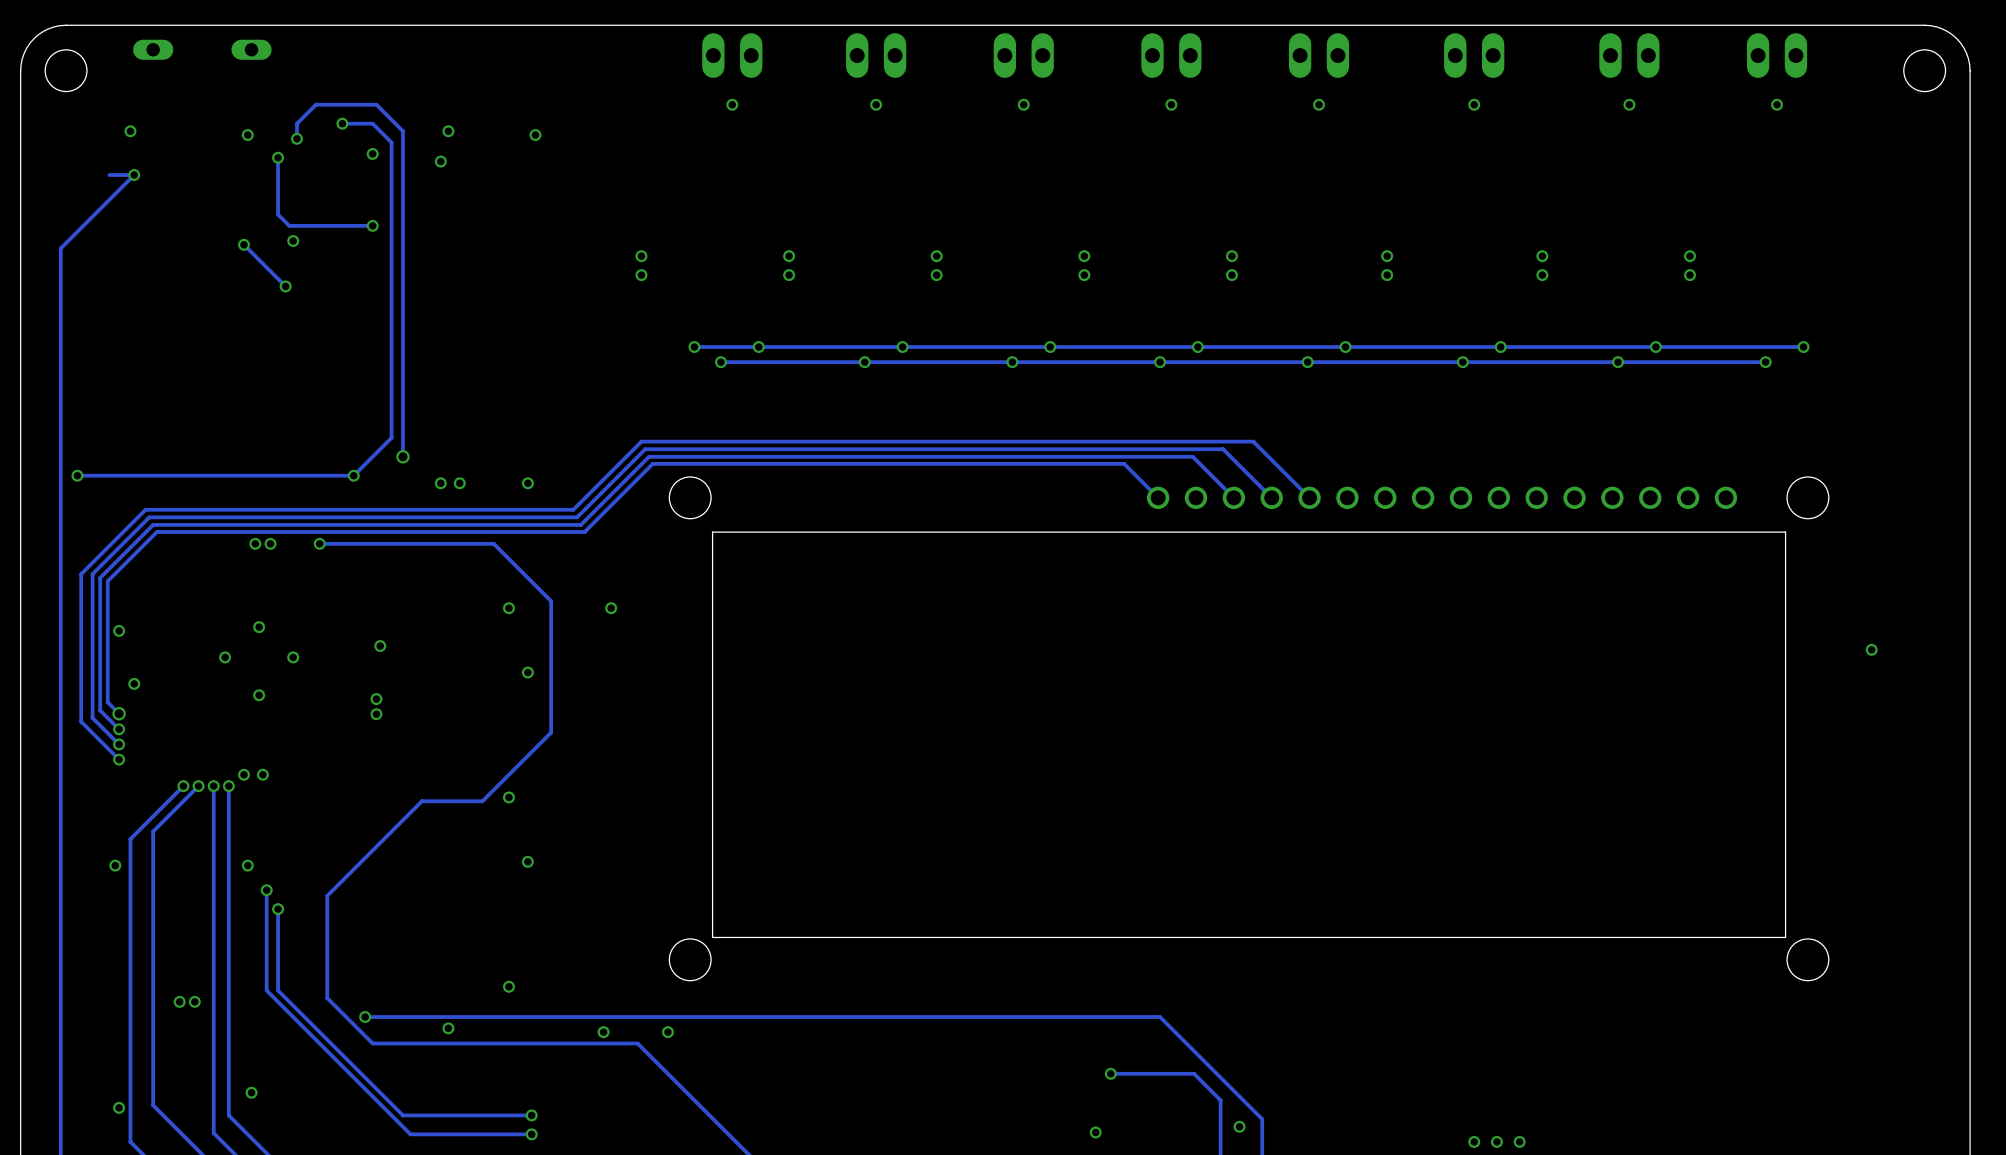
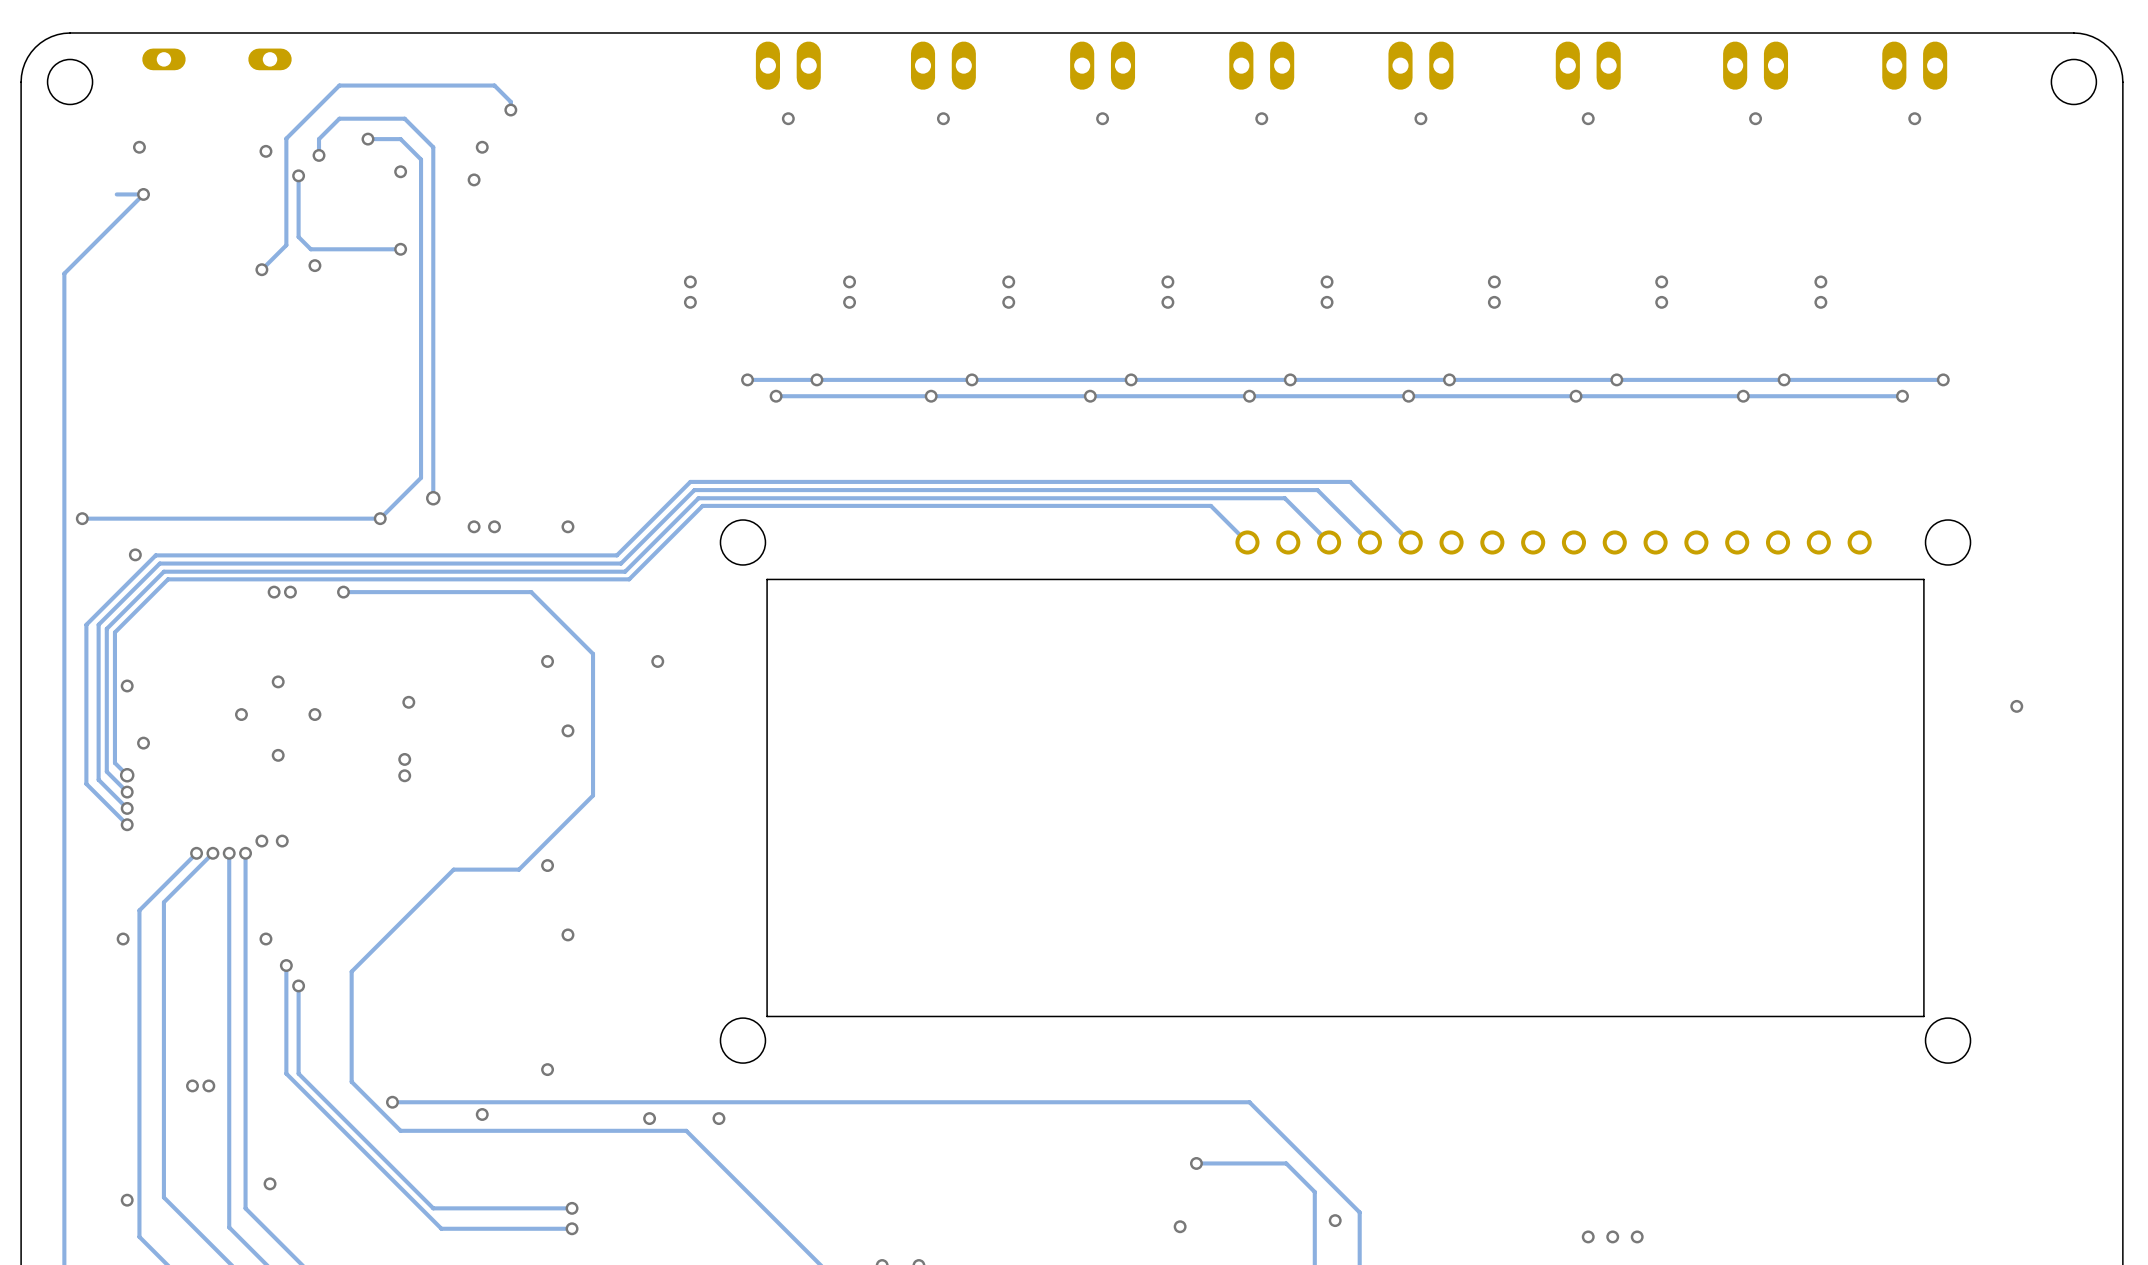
via position: (535, 135) -> (510, 110)
track: (243, 244) (285, 286) -> (261, 269) (286, 245) (286, 138) (339, 85) (494, 85) (510, 101) (510, 110)
via: (285, 286) -> none
via: none -> (135, 554)

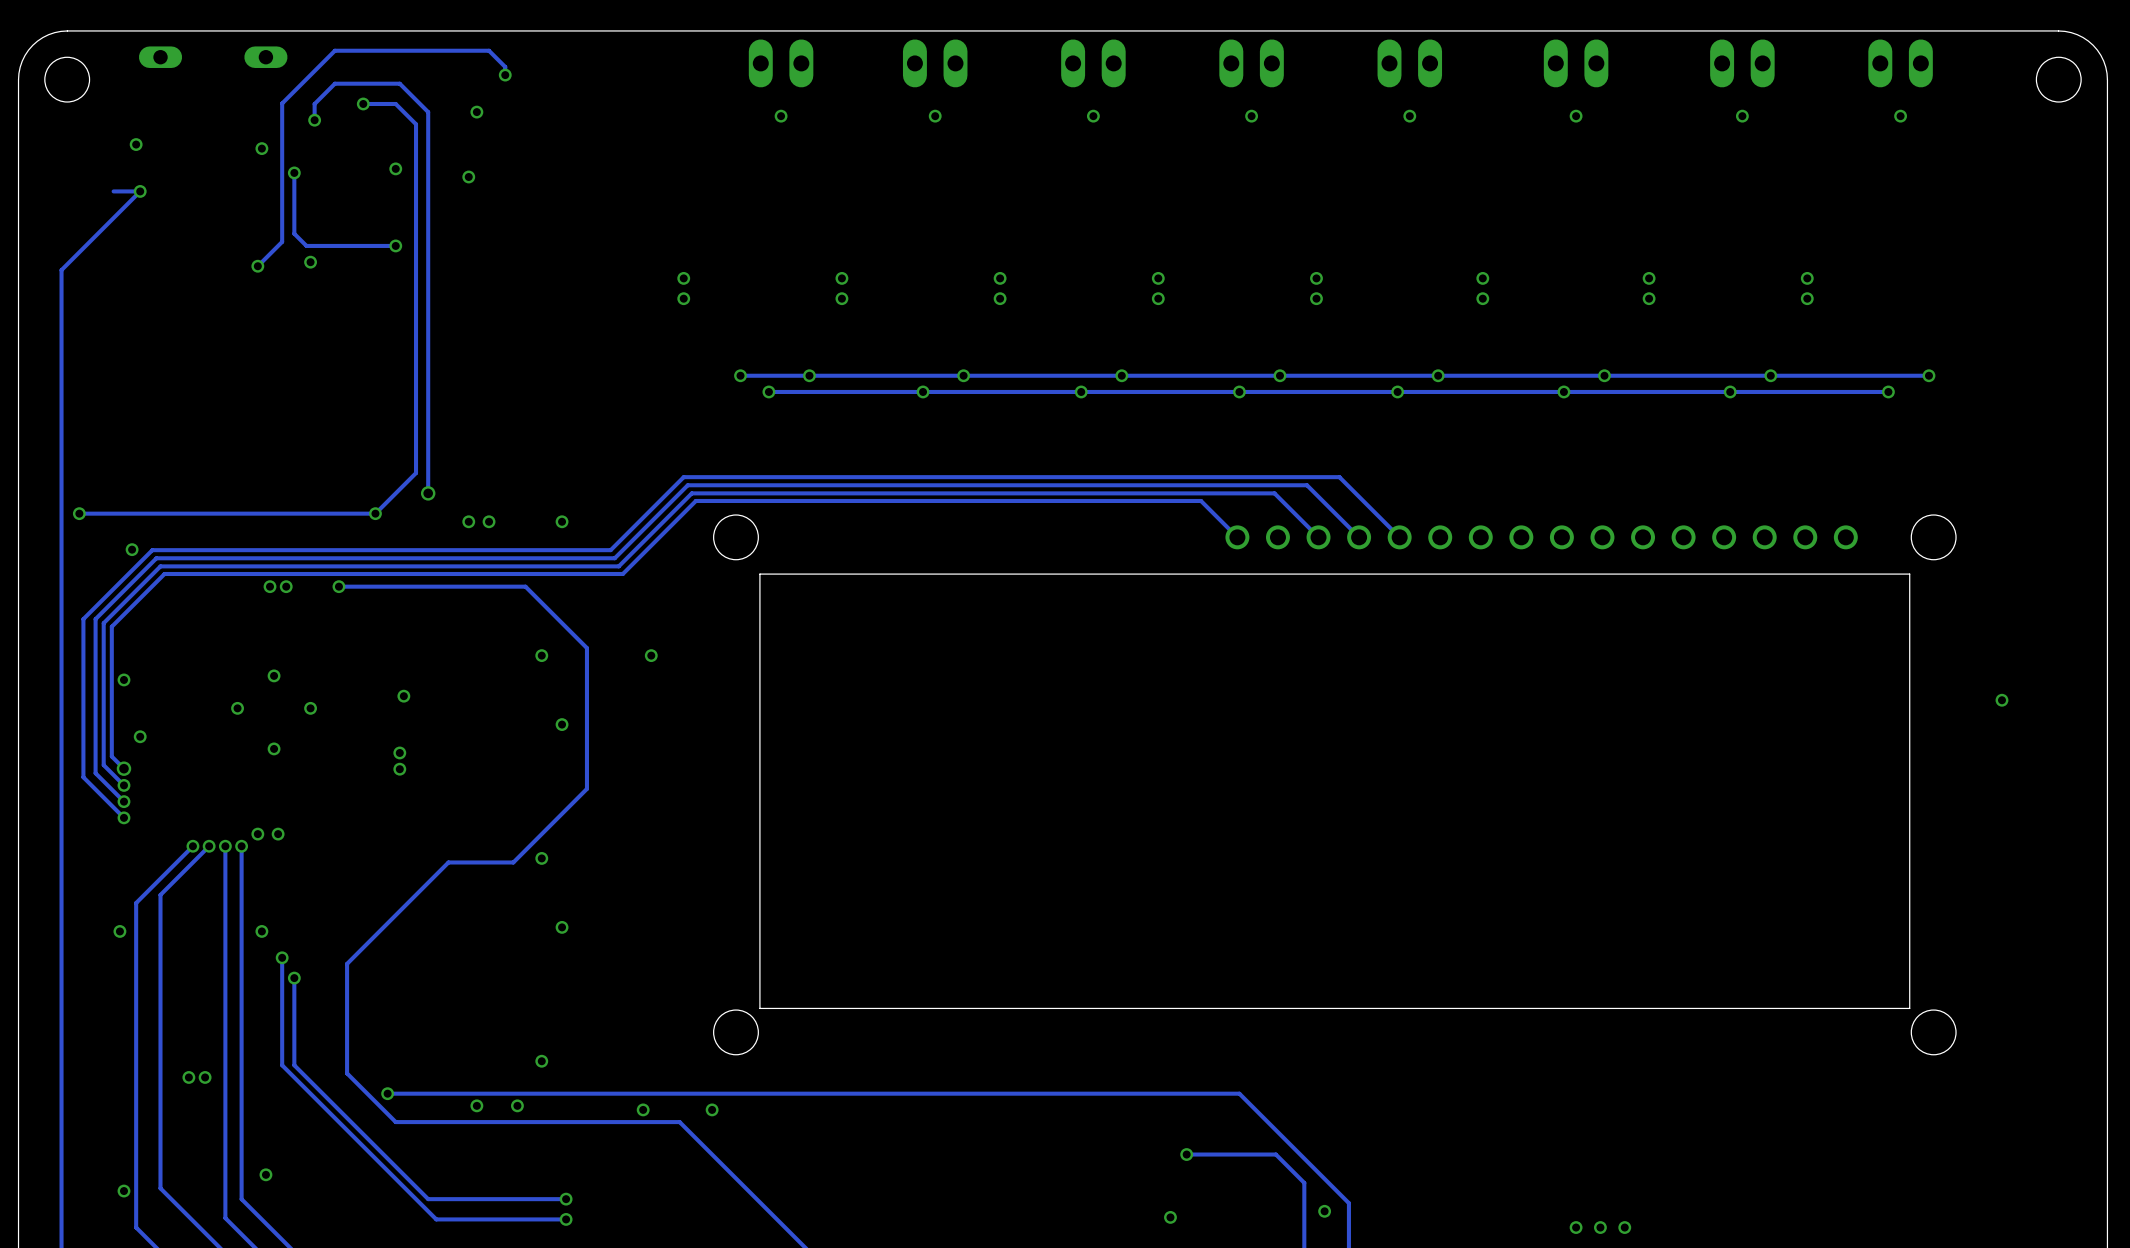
via: none -> (505, 75)
via: none -> (363, 103)
track: (510, 110) (510, 101) (494, 85) (339, 85) (286, 138) -> (505, 75) (505, 66) (489, 50) (334, 50) (282, 103) (282, 135)
via: (510, 110) -> none
via: none -> (476, 112)
via: none -> (314, 120)
track: (367, 139) (400, 139) (421, 159) -> (363, 103) (395, 103) (416, 124) (416, 156)
via: (367, 139) -> none
track: (433, 147) (404, 118) (339, 118) (319, 139) (319, 155) -> (428, 144) (428, 112) (399, 83) (334, 83) (314, 103) (314, 120)
via: (482, 147) -> none
via: (319, 155) -> none
via: none -> (517, 1105)

